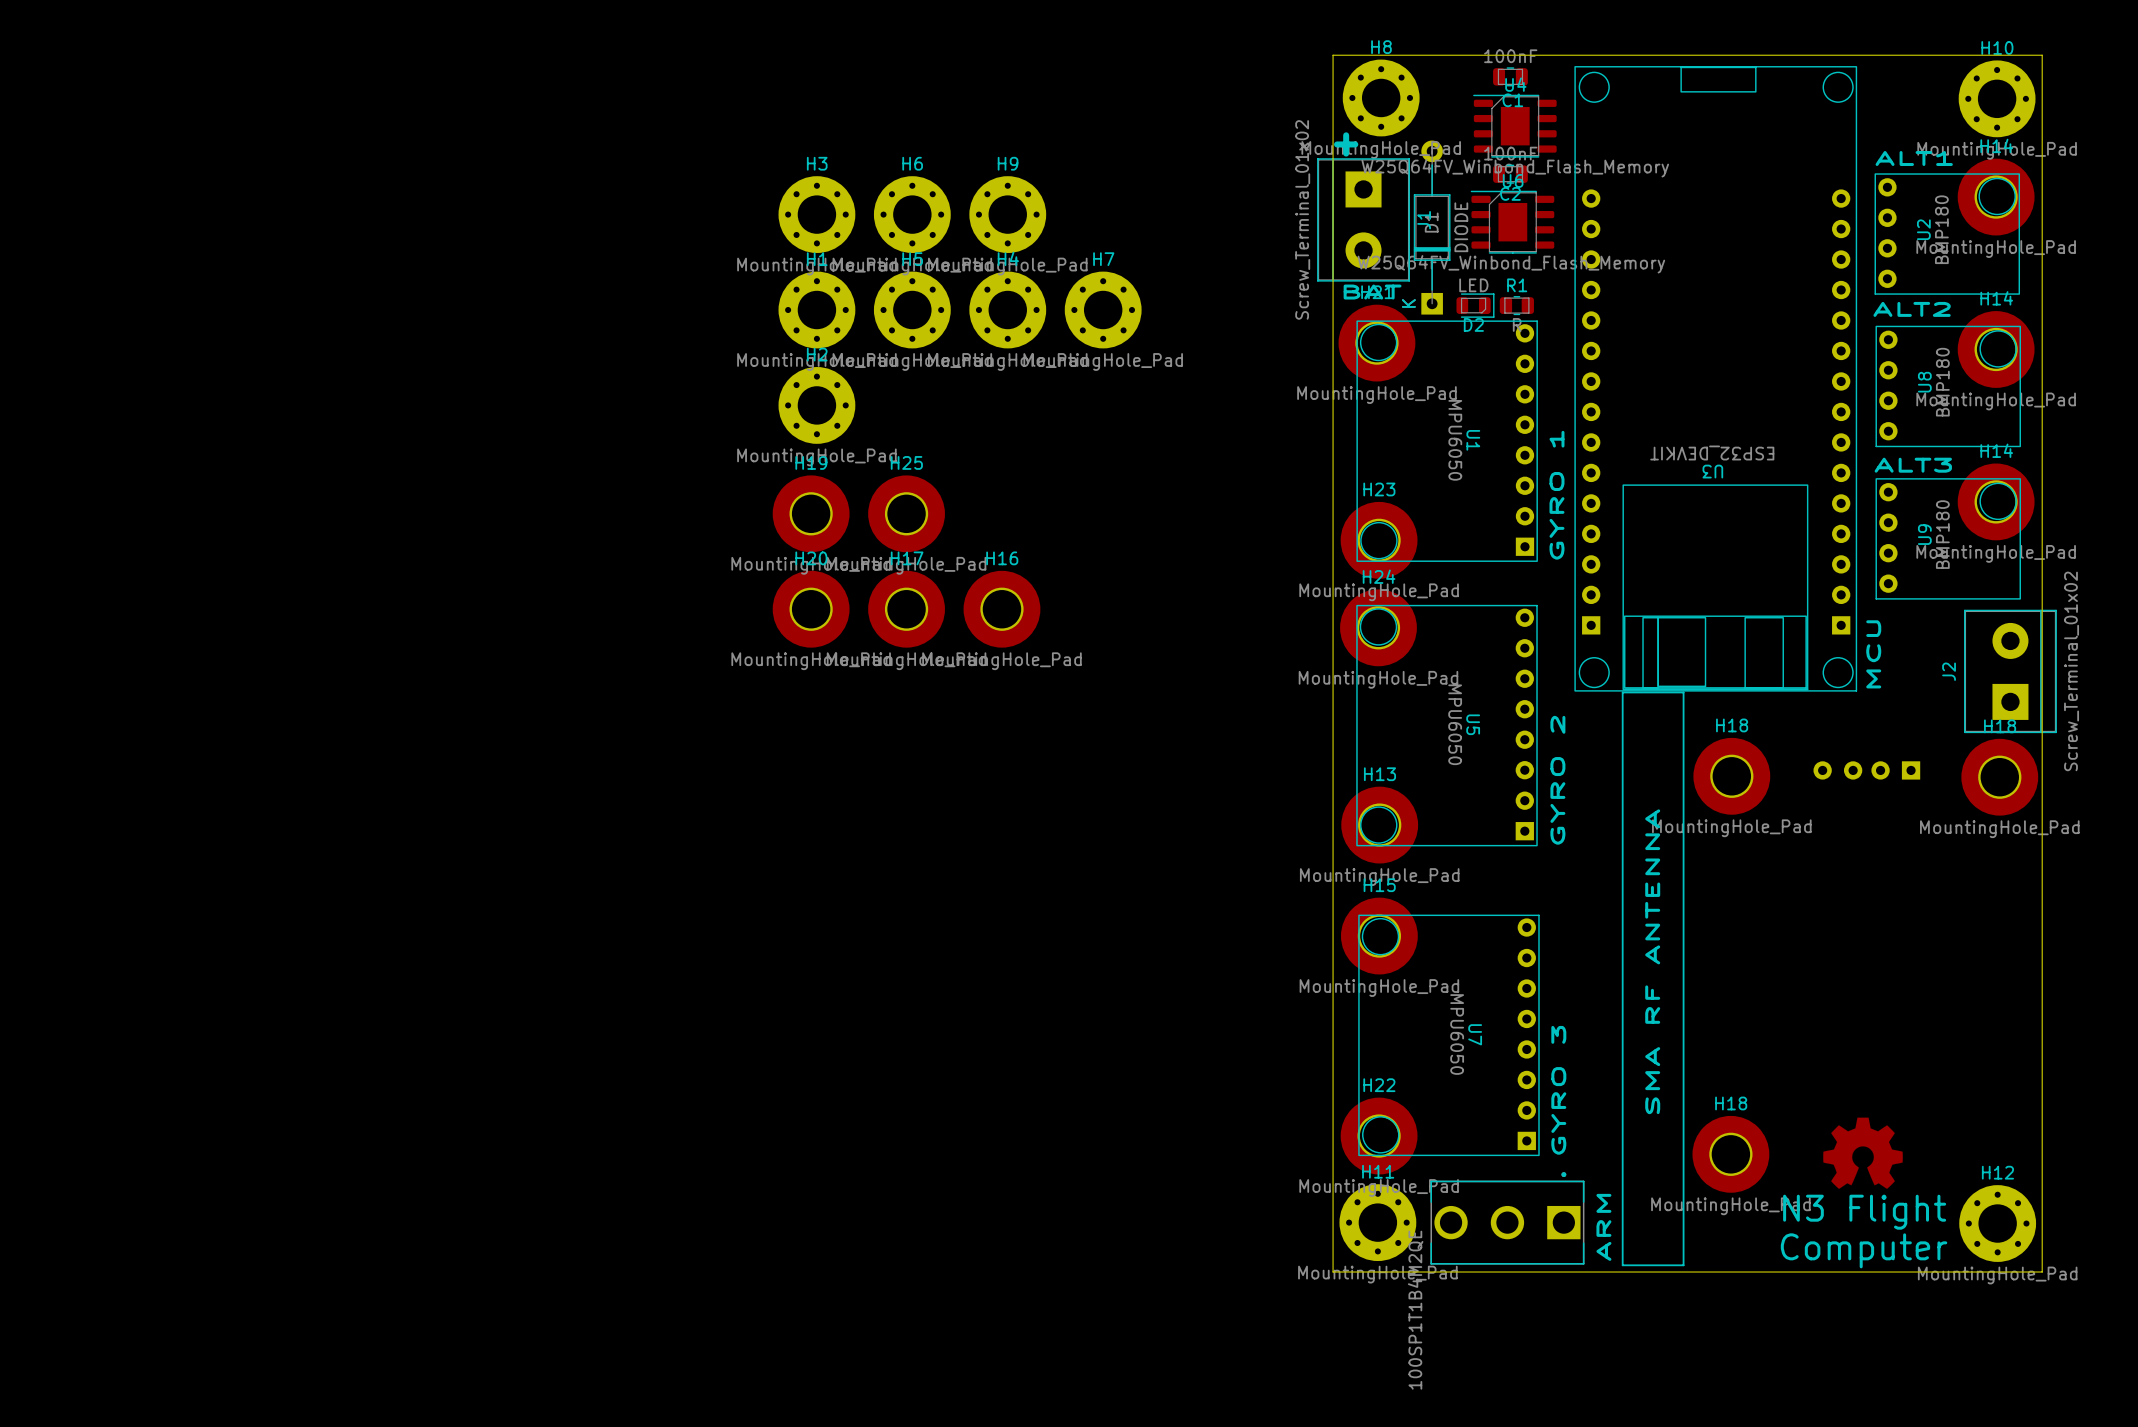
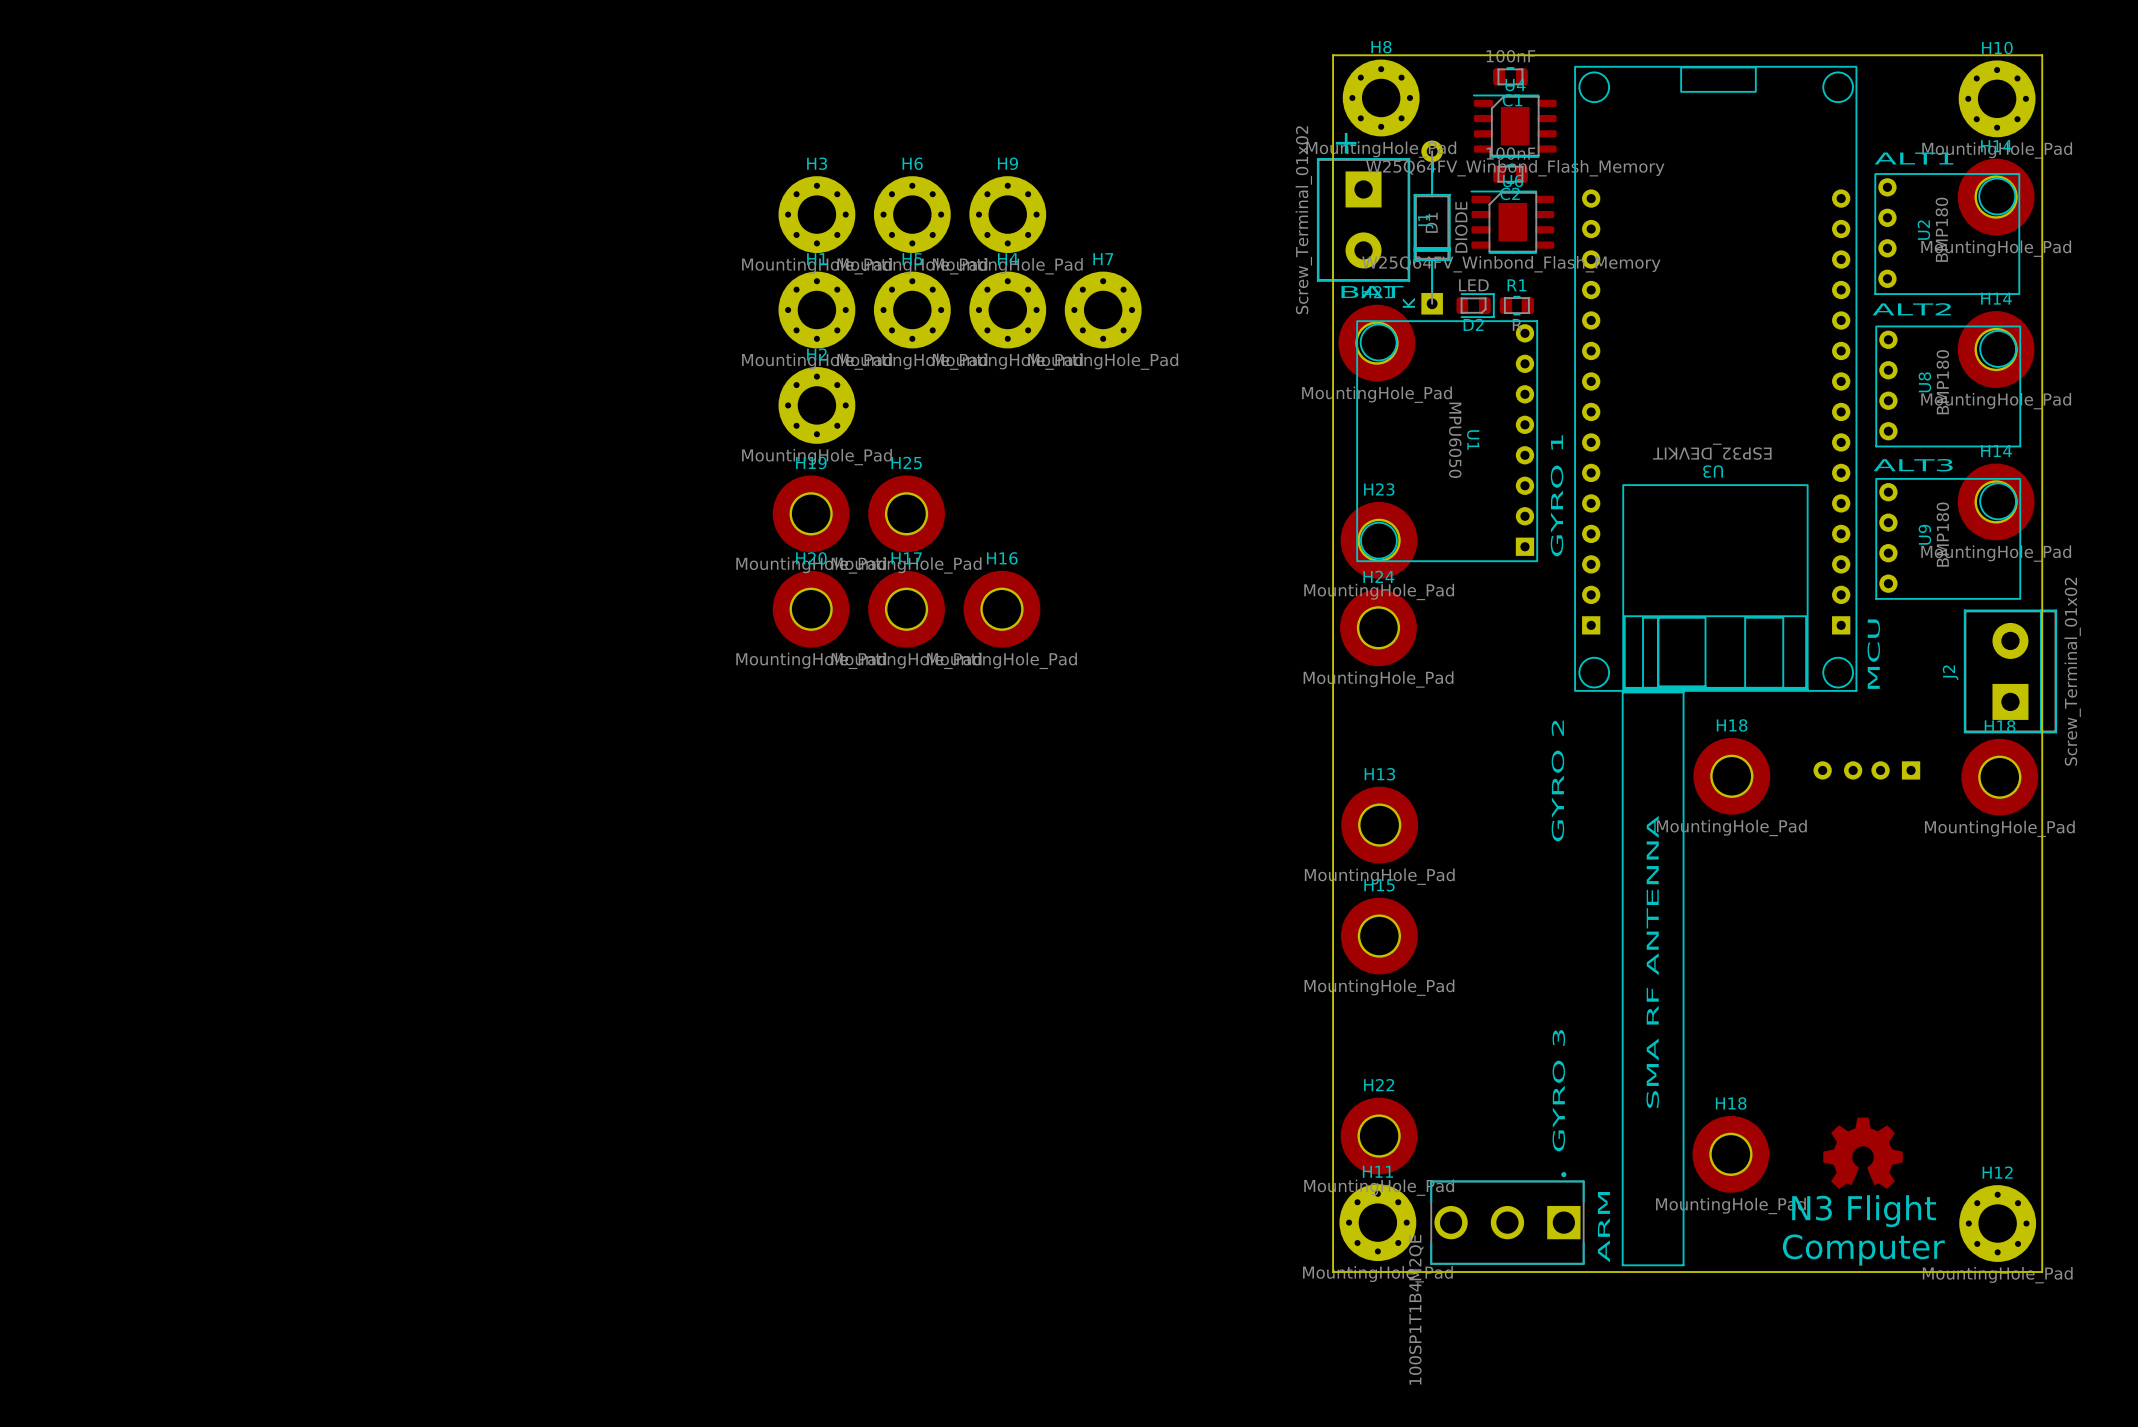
U5: MPU6050 (1446, 725) -> none
U7: MPU6050 (1448, 1035) -> none

